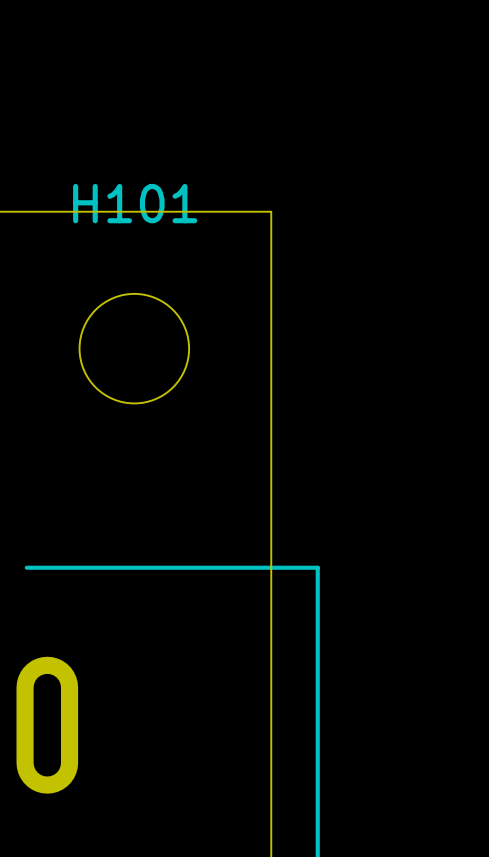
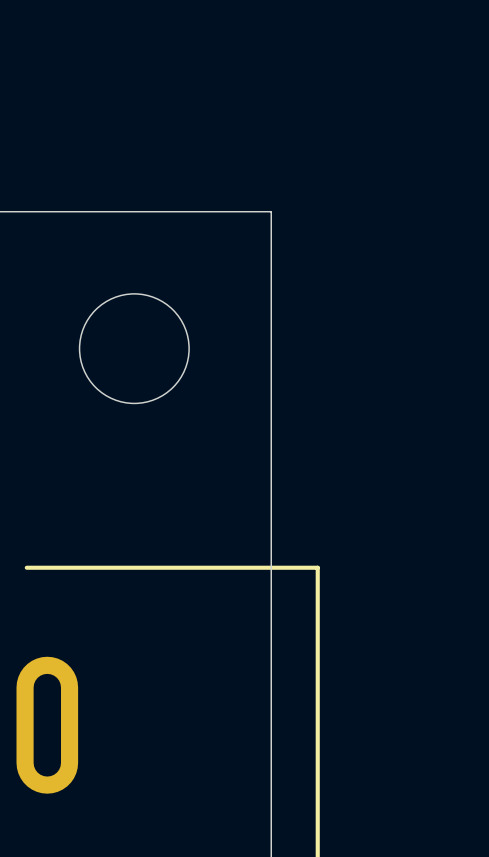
H101 name: H101 (135, 203) -> none

